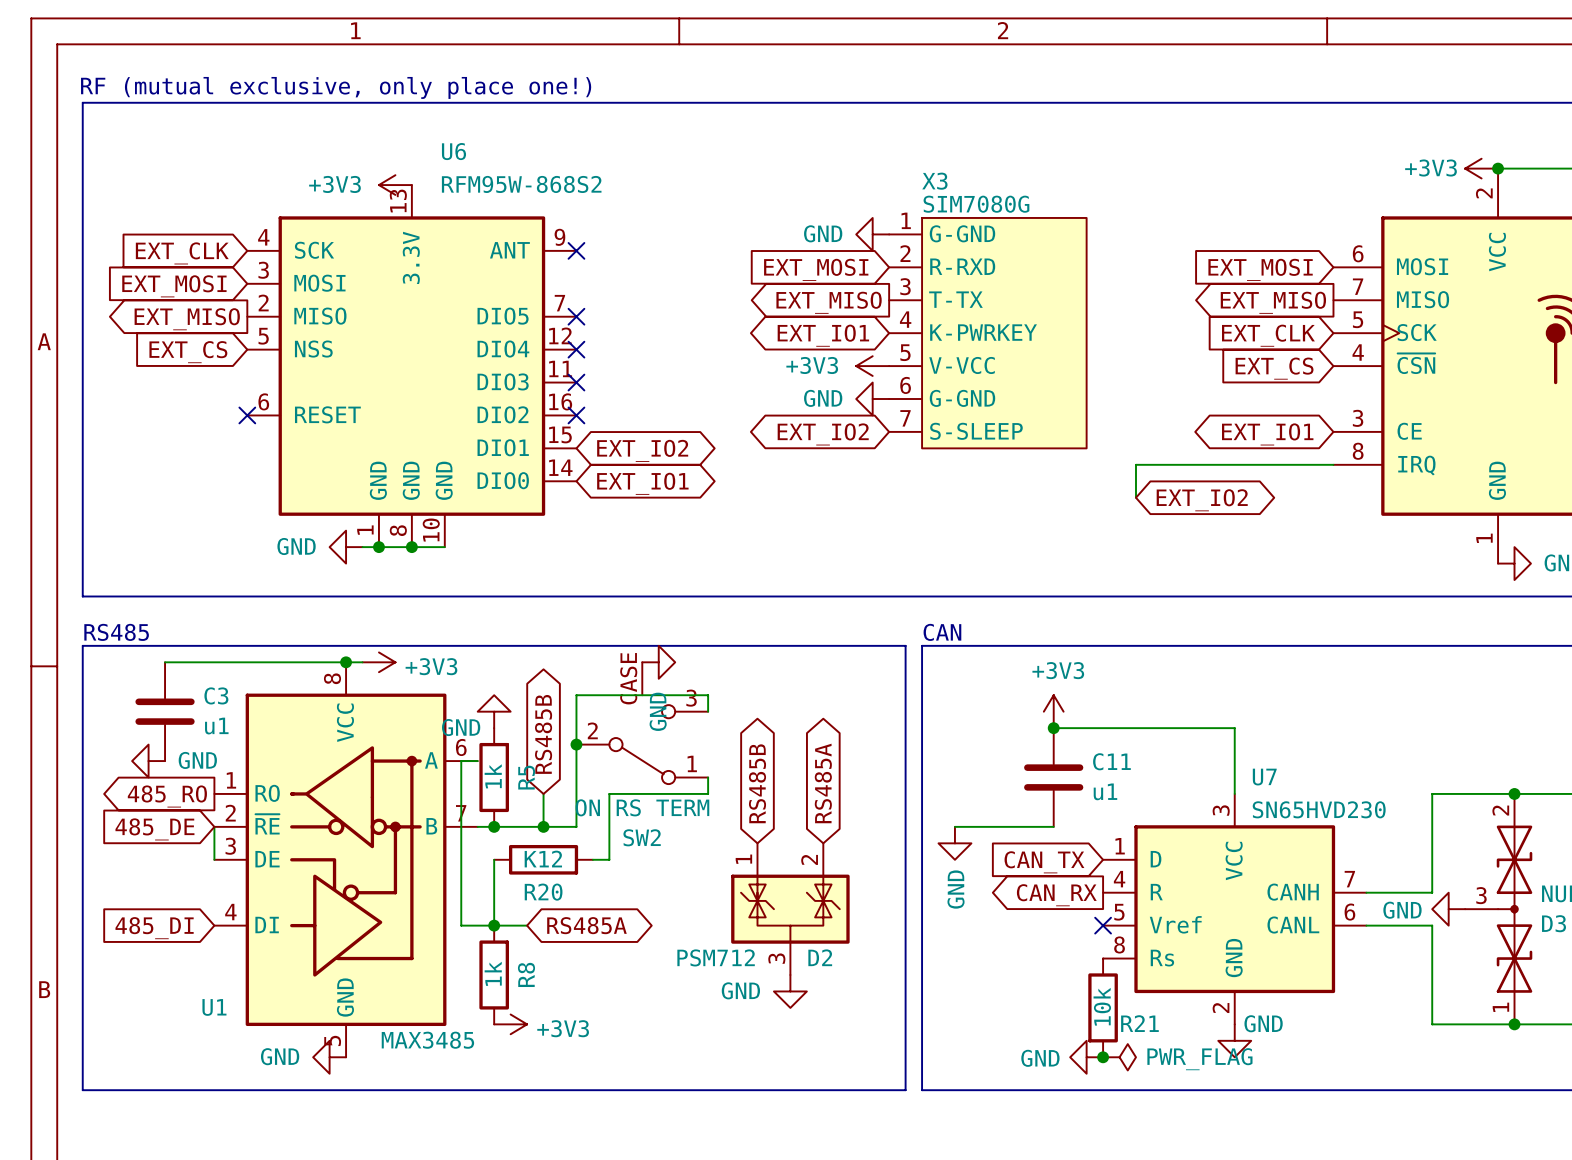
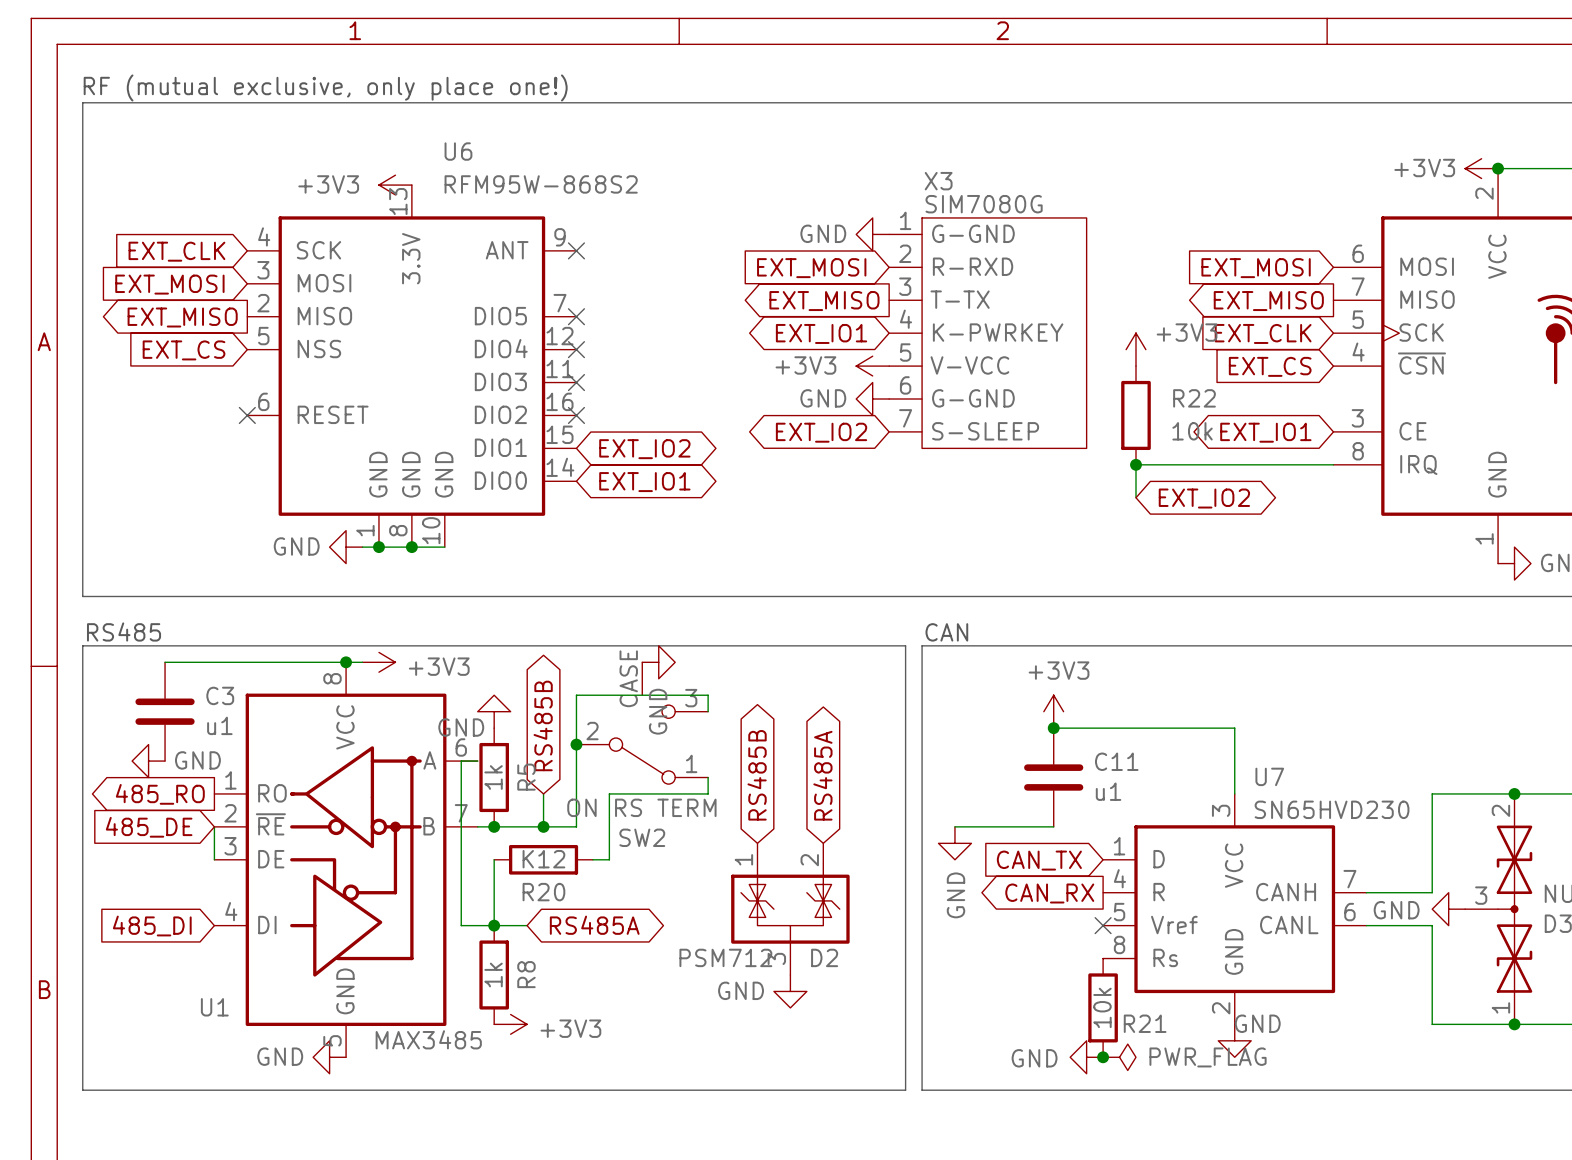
power symbol: none -> +3V3 (1135, 349)
R22: none -> 10k (1135, 415)
junction: none -> (1135, 464)

